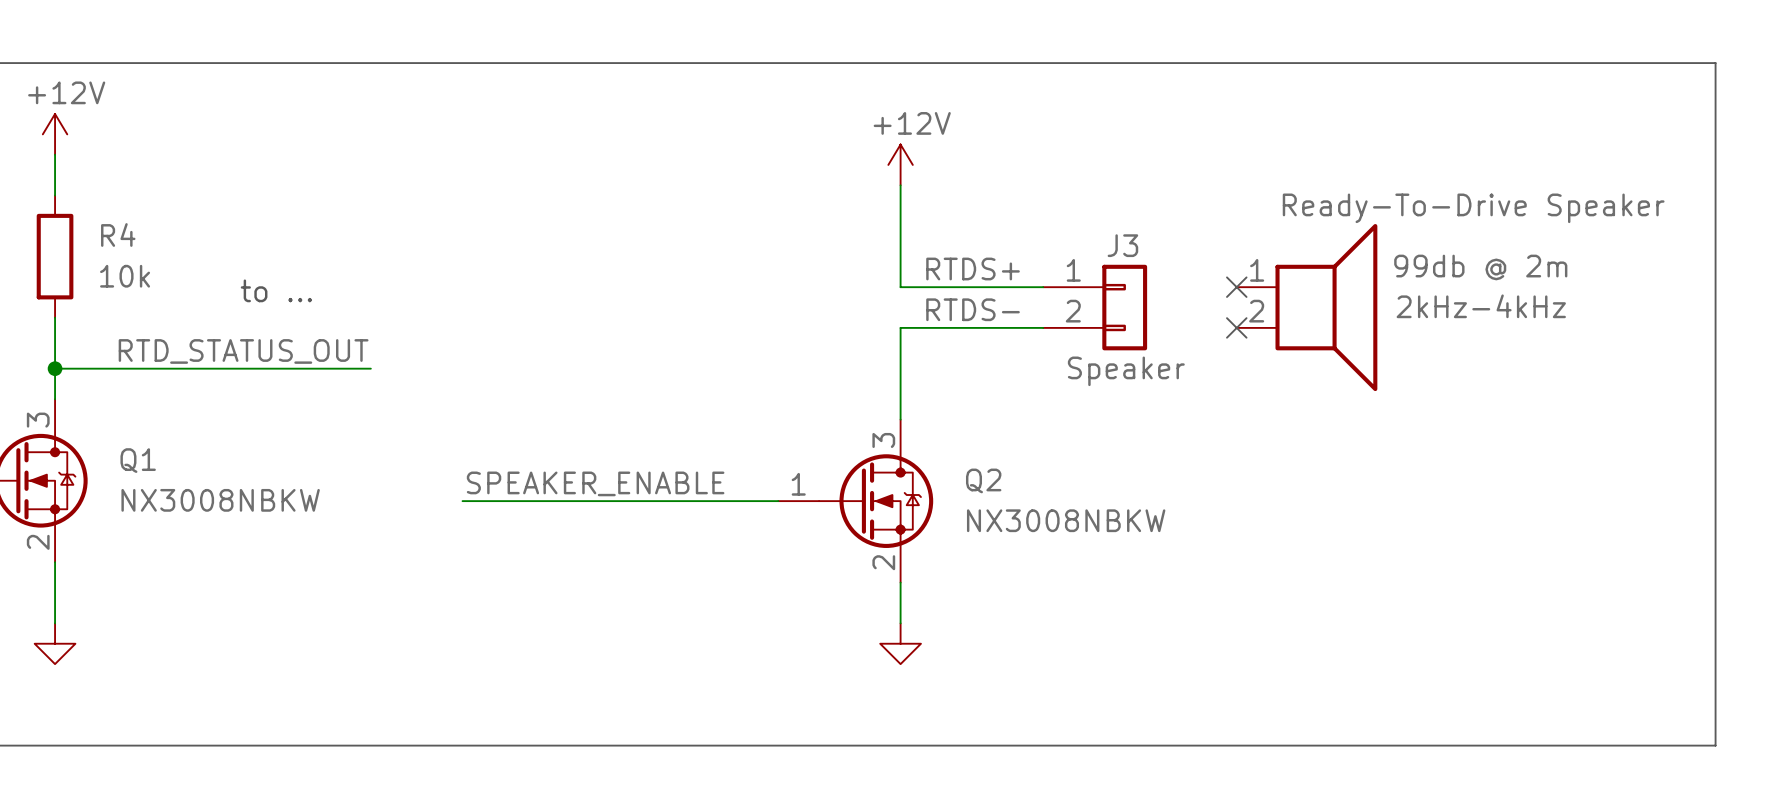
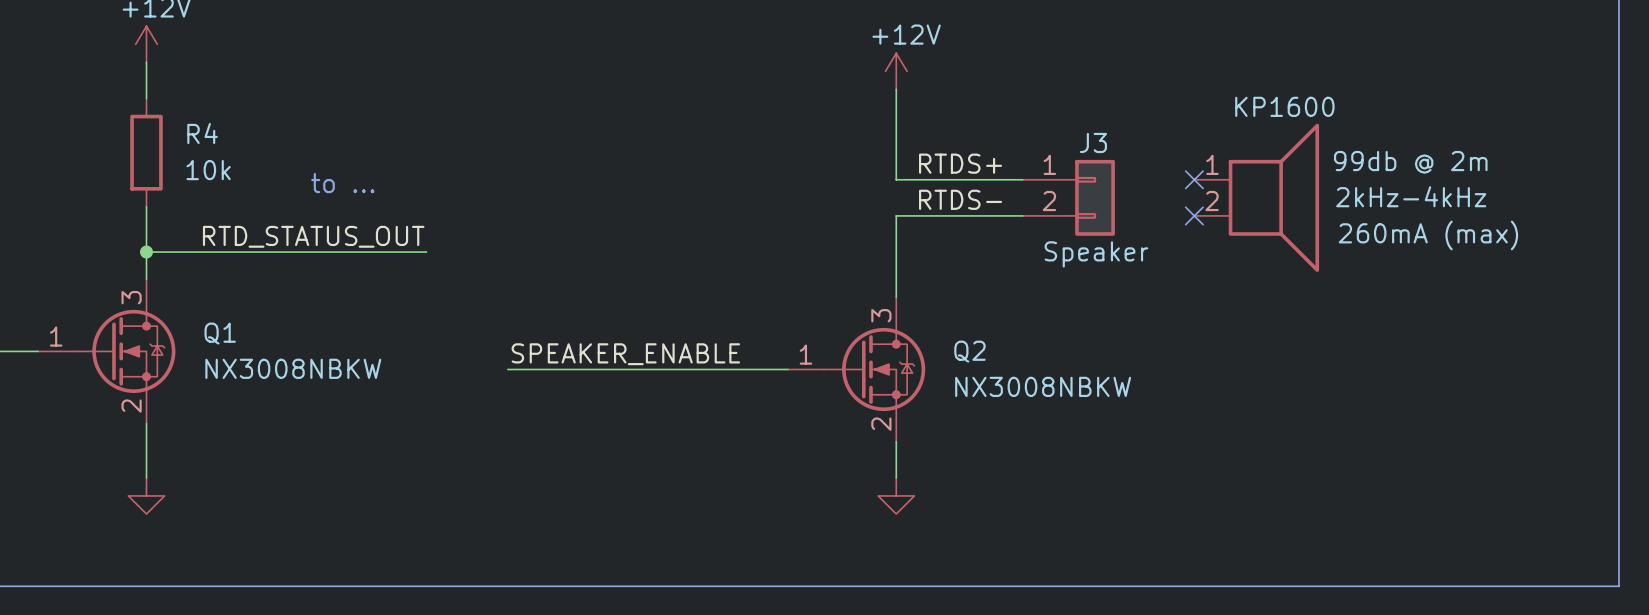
power symbol: Ready-To-Drive Speaker (1307, 307) -> KP1600 (1256, 197)

